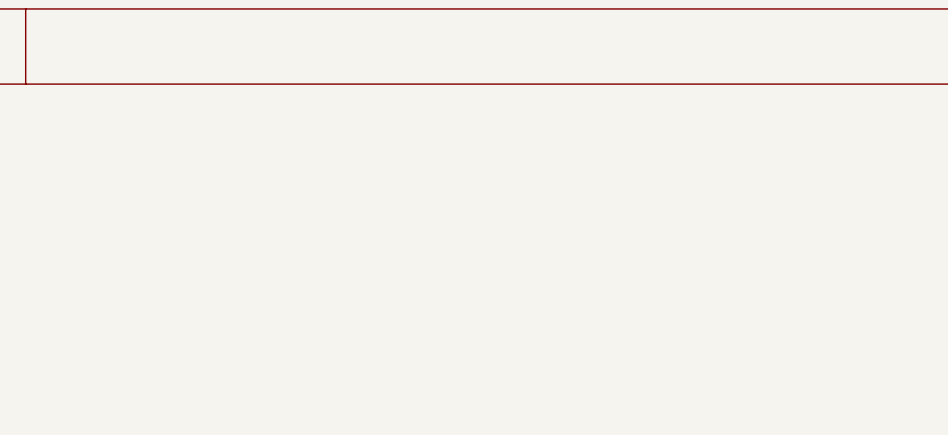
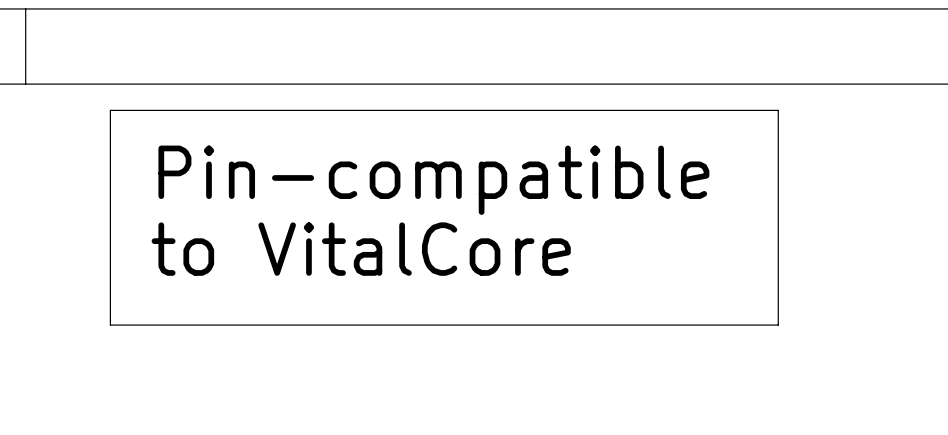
line: none -> (110, 110) (778, 110) (778, 325) (110, 325) (110, 110)
text: none -> Pin-compatible (433, 180)
text: none -> to VitalCore (361, 249)

